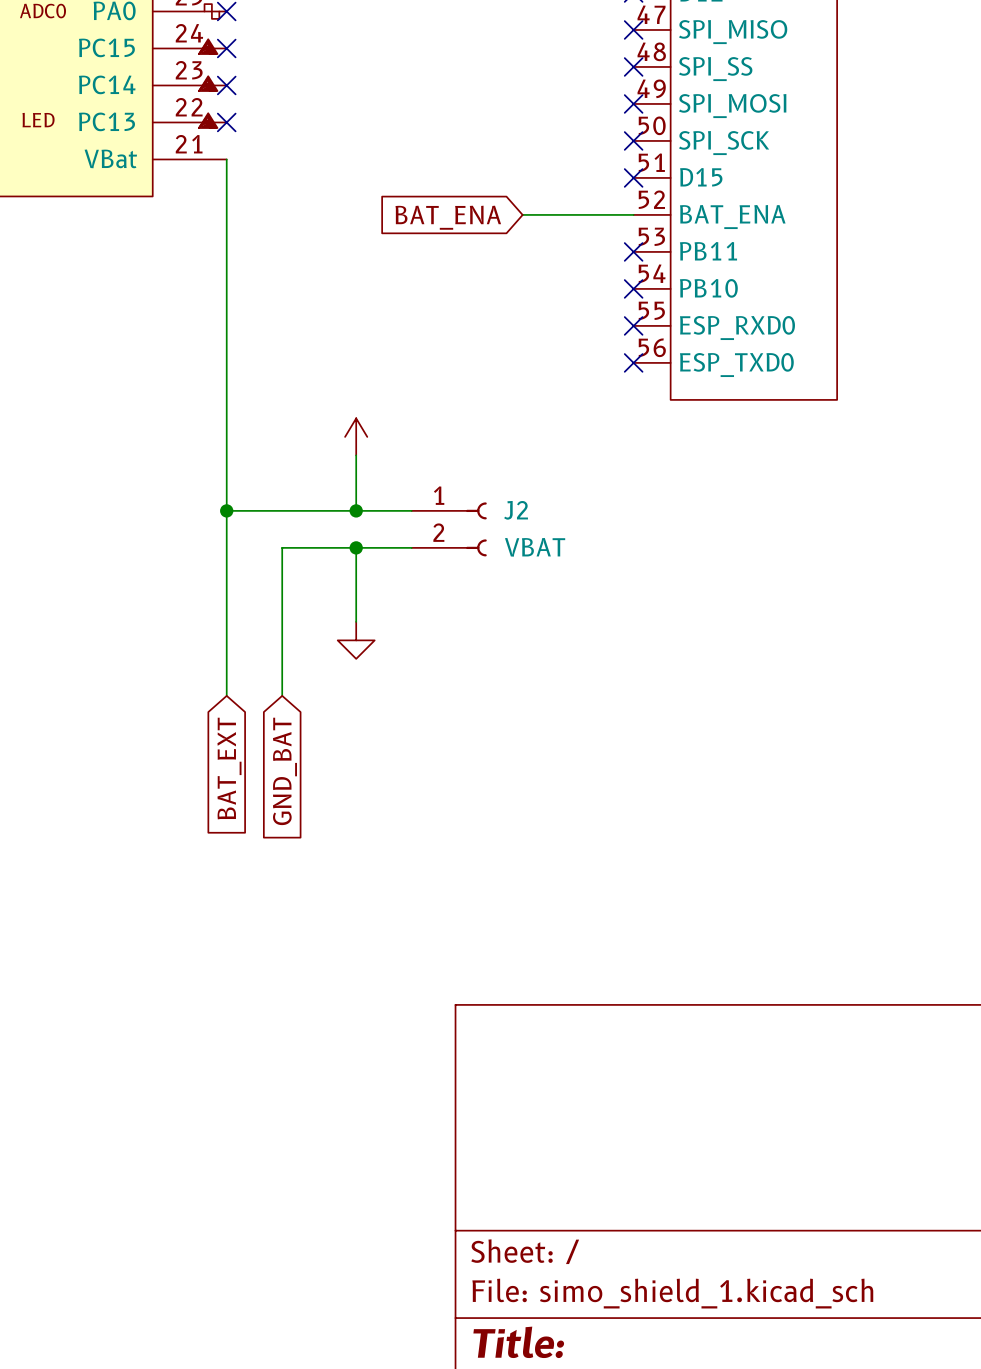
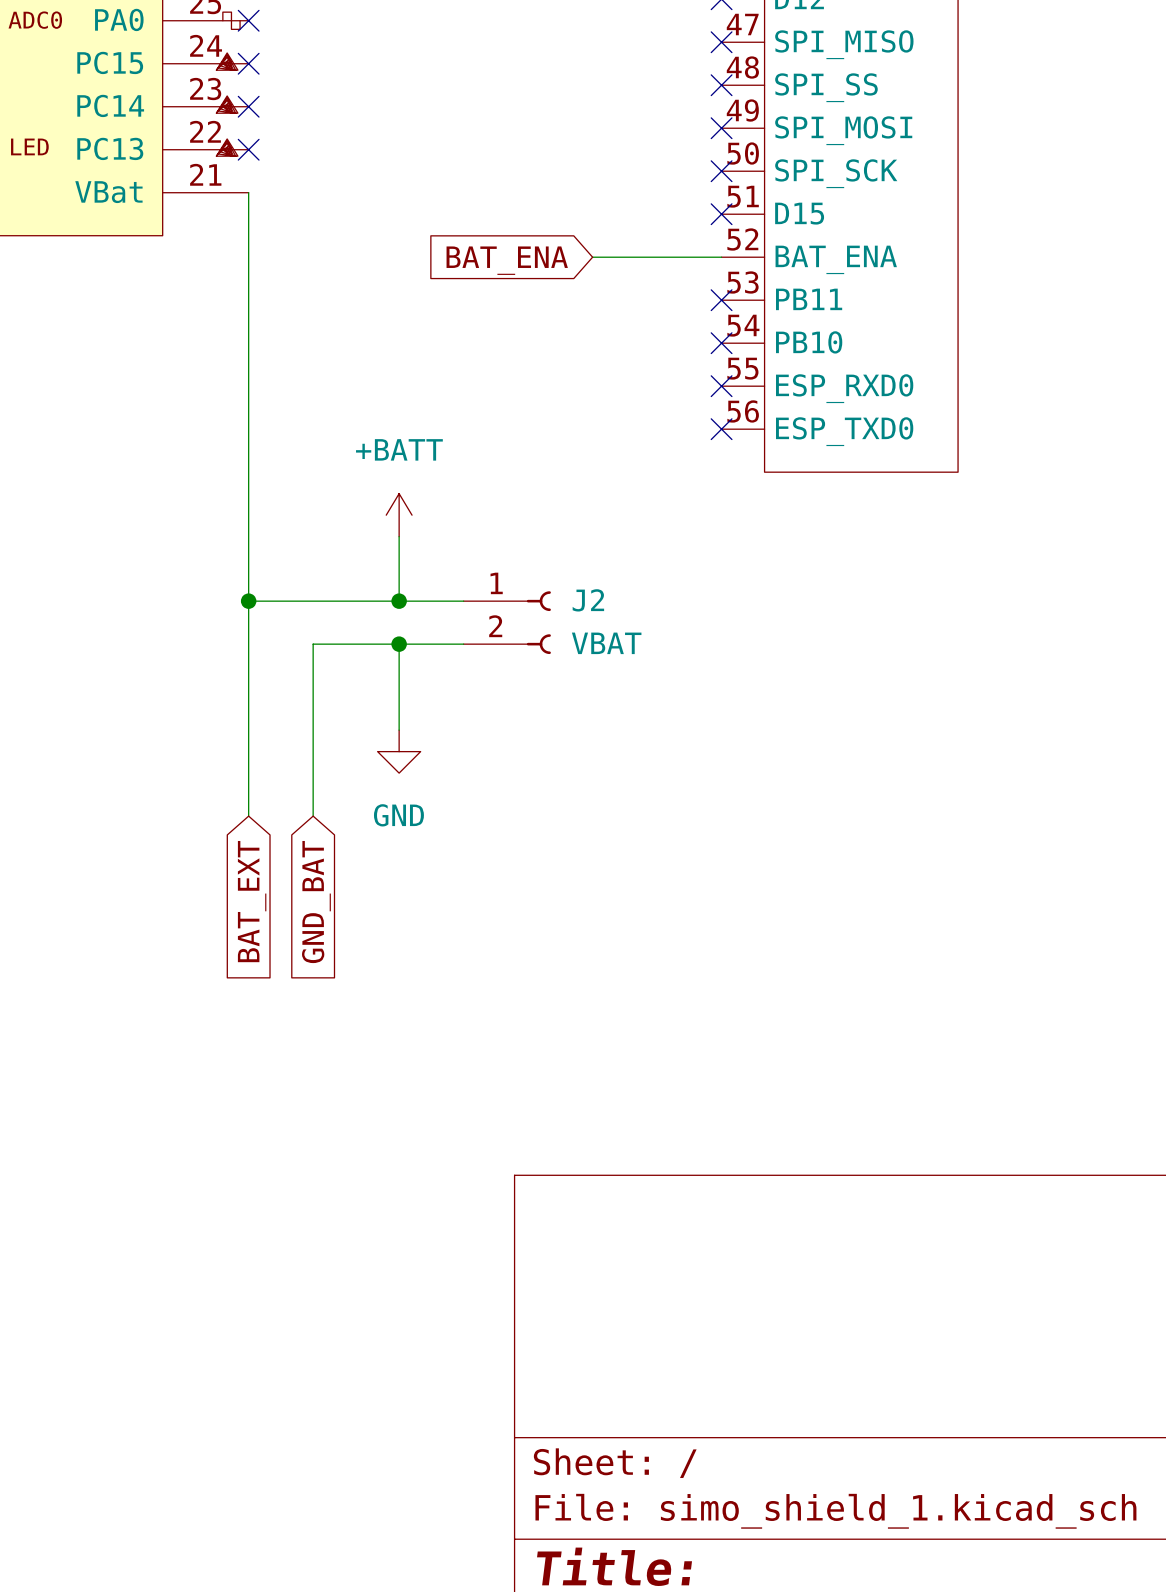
power symbol text: none -> +BATT (399, 449)
power symbol text: none -> GND (398, 815)

